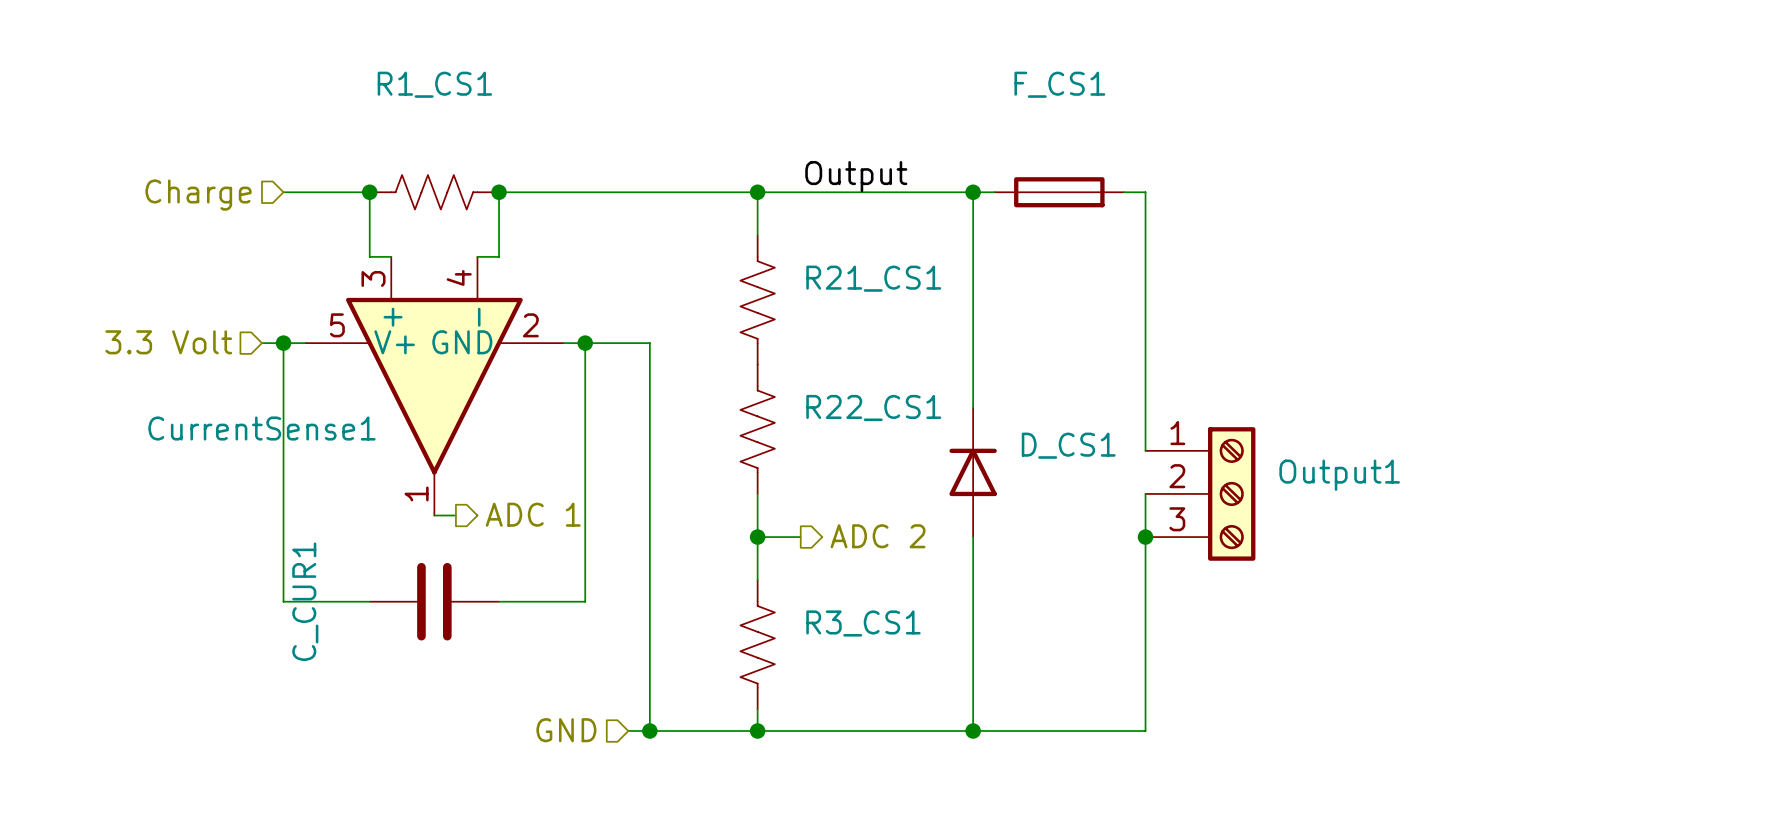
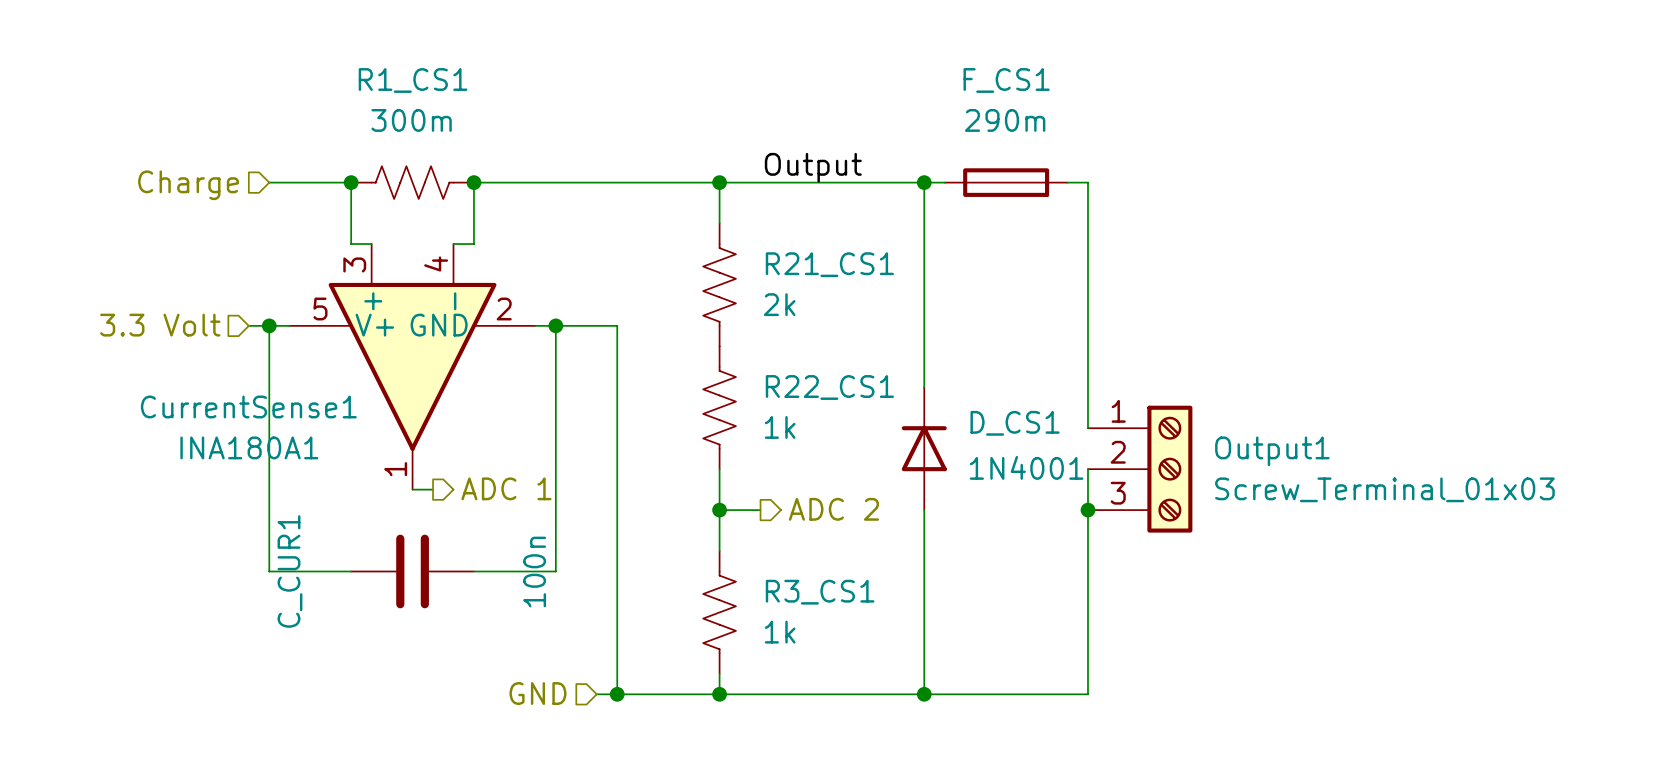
R1_CS1 value: none -> 300m (411, 120)
F_CS1 value: none -> 290m (1005, 120)
R21_CS1 value: none -> 2k (779, 304)
R22_CS1 value: none -> 1k (780, 427)
CurrentSense1 value: none -> INA180A1 (249, 447)
D_CS1 value: none -> 1N4001 (1026, 467)
Output1 value: none -> Screw_Terminal_01x03 (1384, 489)
C_CUR1 value: none -> 100n (534, 571)
R3_CS1 value: none -> 1k (780, 632)

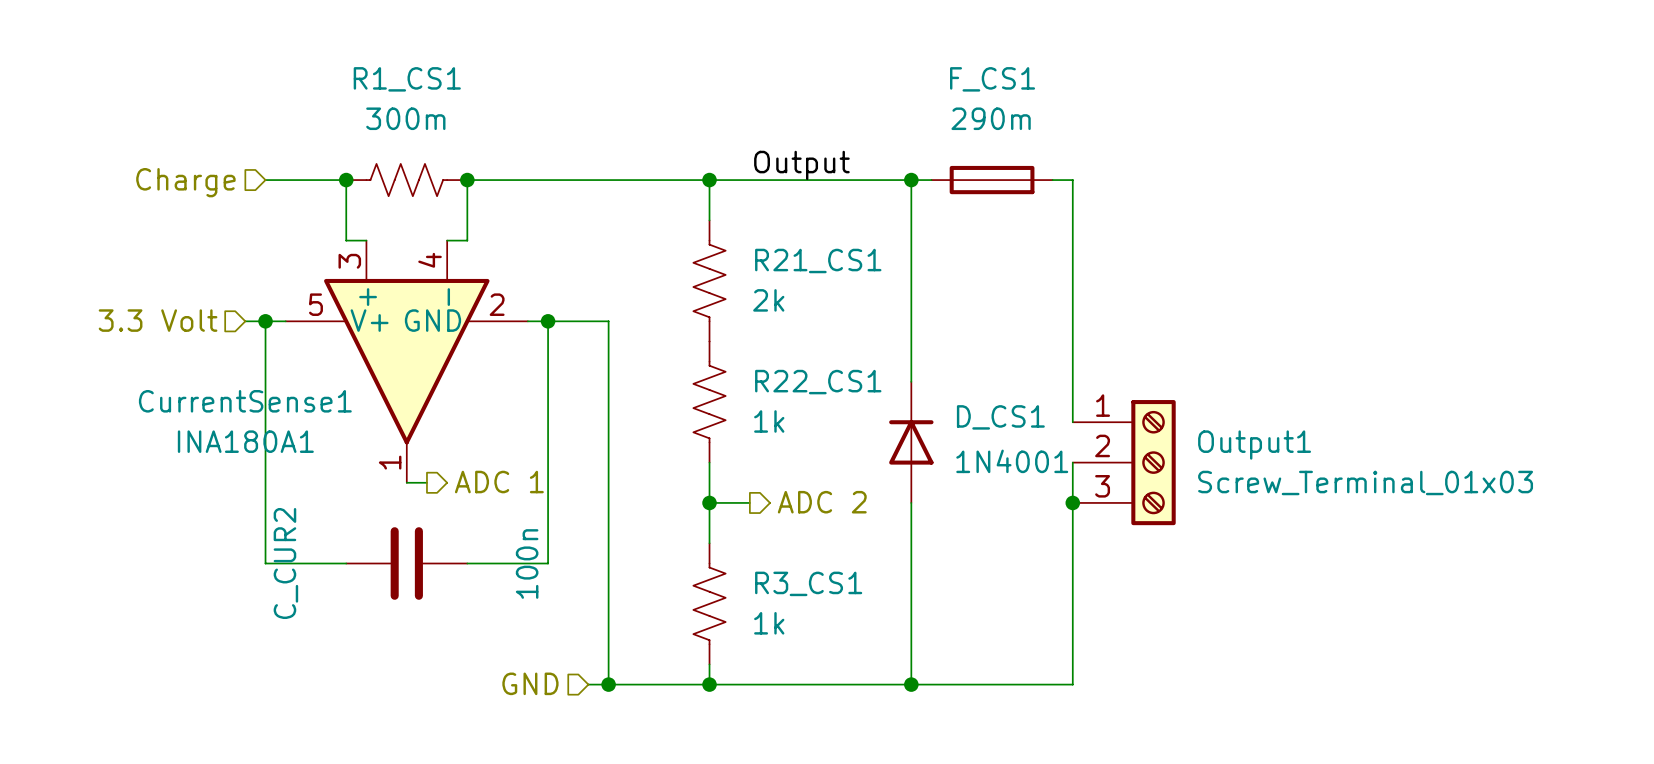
C_CUR1 name: C_CUR1 (289, 571) -> C_CUR2 (285, 563)

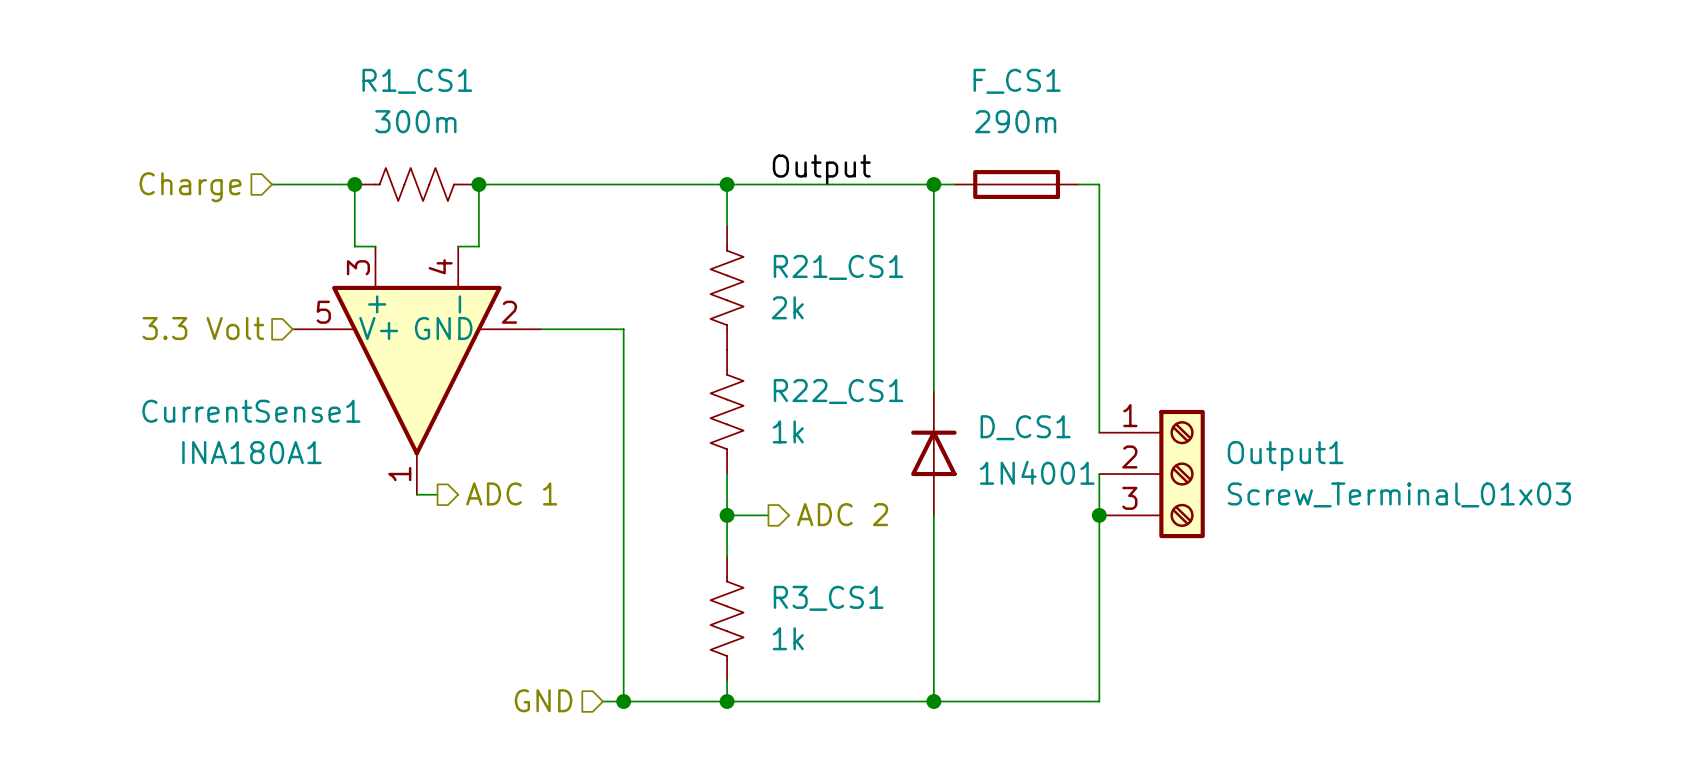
hierarchical label position: 3.3 Volt (158, 320) -> 3.3 Volt (203, 328)
wire: (245, 321) (285, 321) -> none
wire: (265, 321) (265, 563) (346, 563) -> none
junction: (265, 321) -> none
wire: (548, 321) (548, 563) (467, 563) -> none
junction: (548, 321) -> none
C_CUR2: 100n (406, 563) -> none

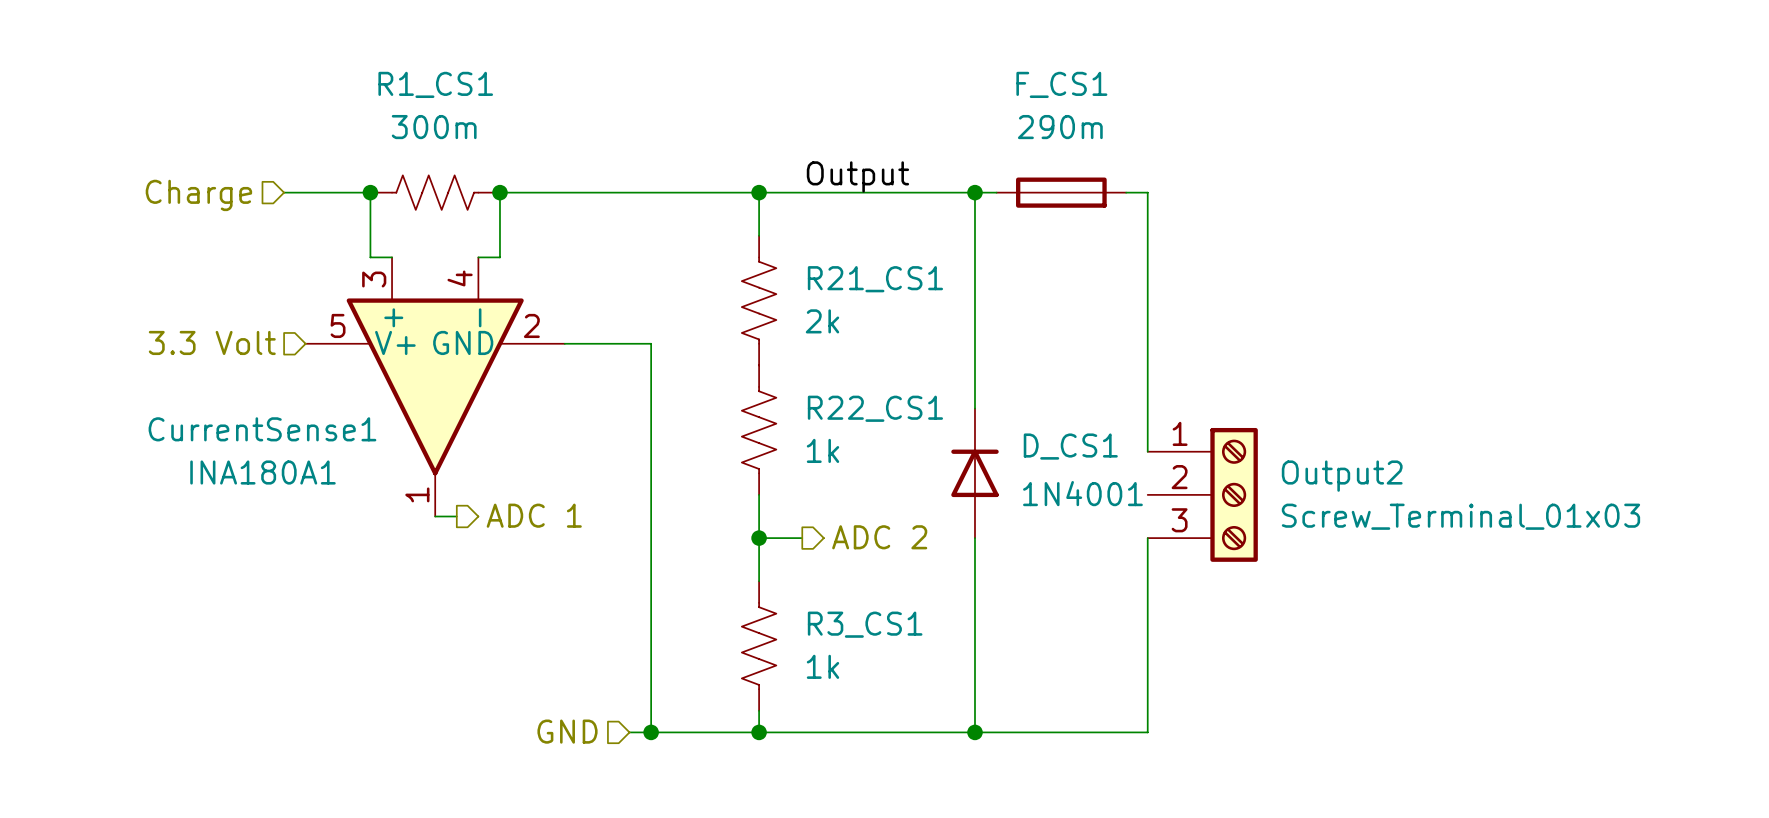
Output1 name: Output1 (1285, 456) -> Output2 (1342, 476)
wire: (1099, 474) (1099, 515) -> none
junction: (1099, 515) -> none

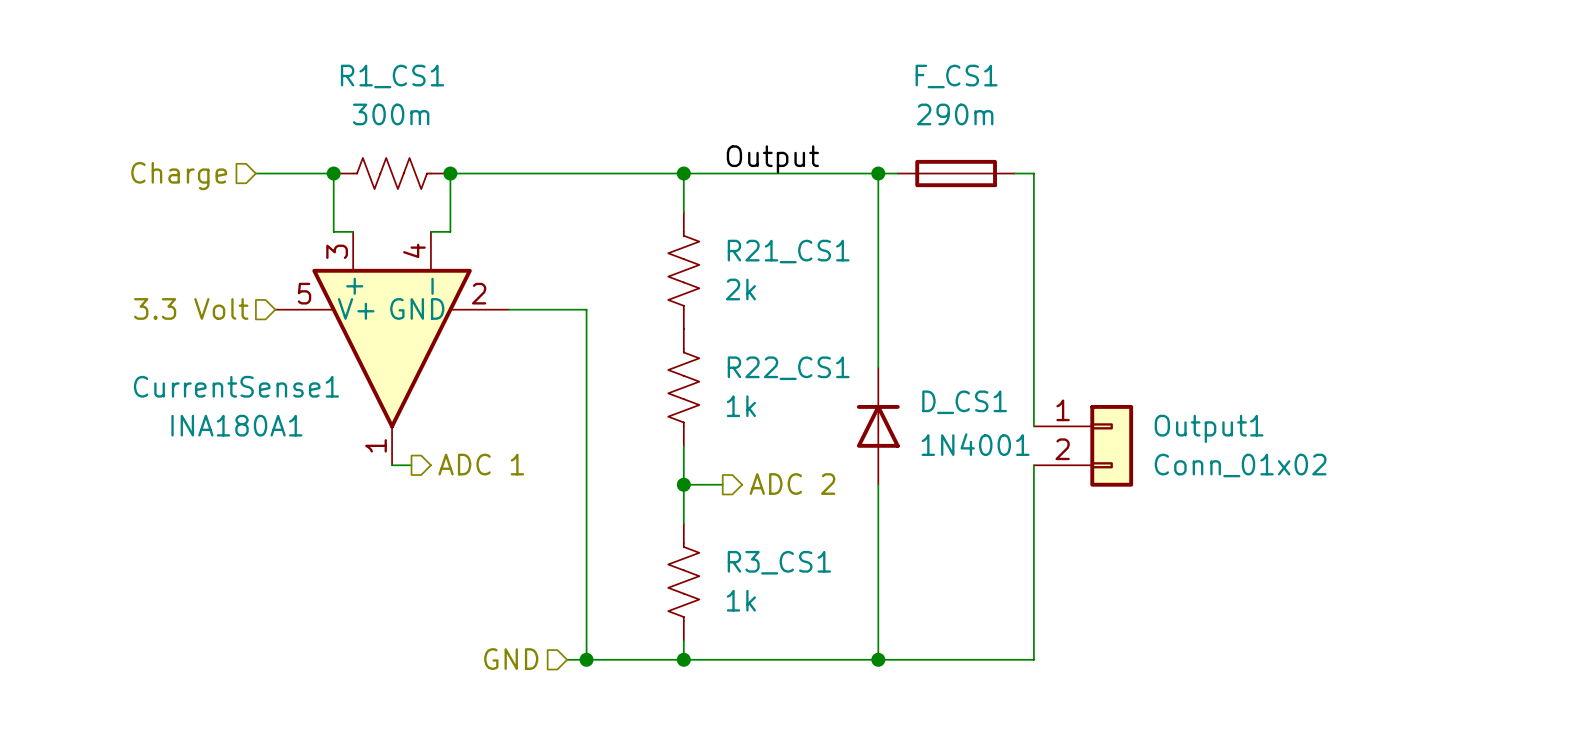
wire: none -> (1033, 406) (1033, 426)
Output2: Screw_Terminal_01x03 (1202, 494) -> none
Output1: none -> Conn_01x02 (1083, 445)
wire: none -> (1033, 465) (1033, 484)

